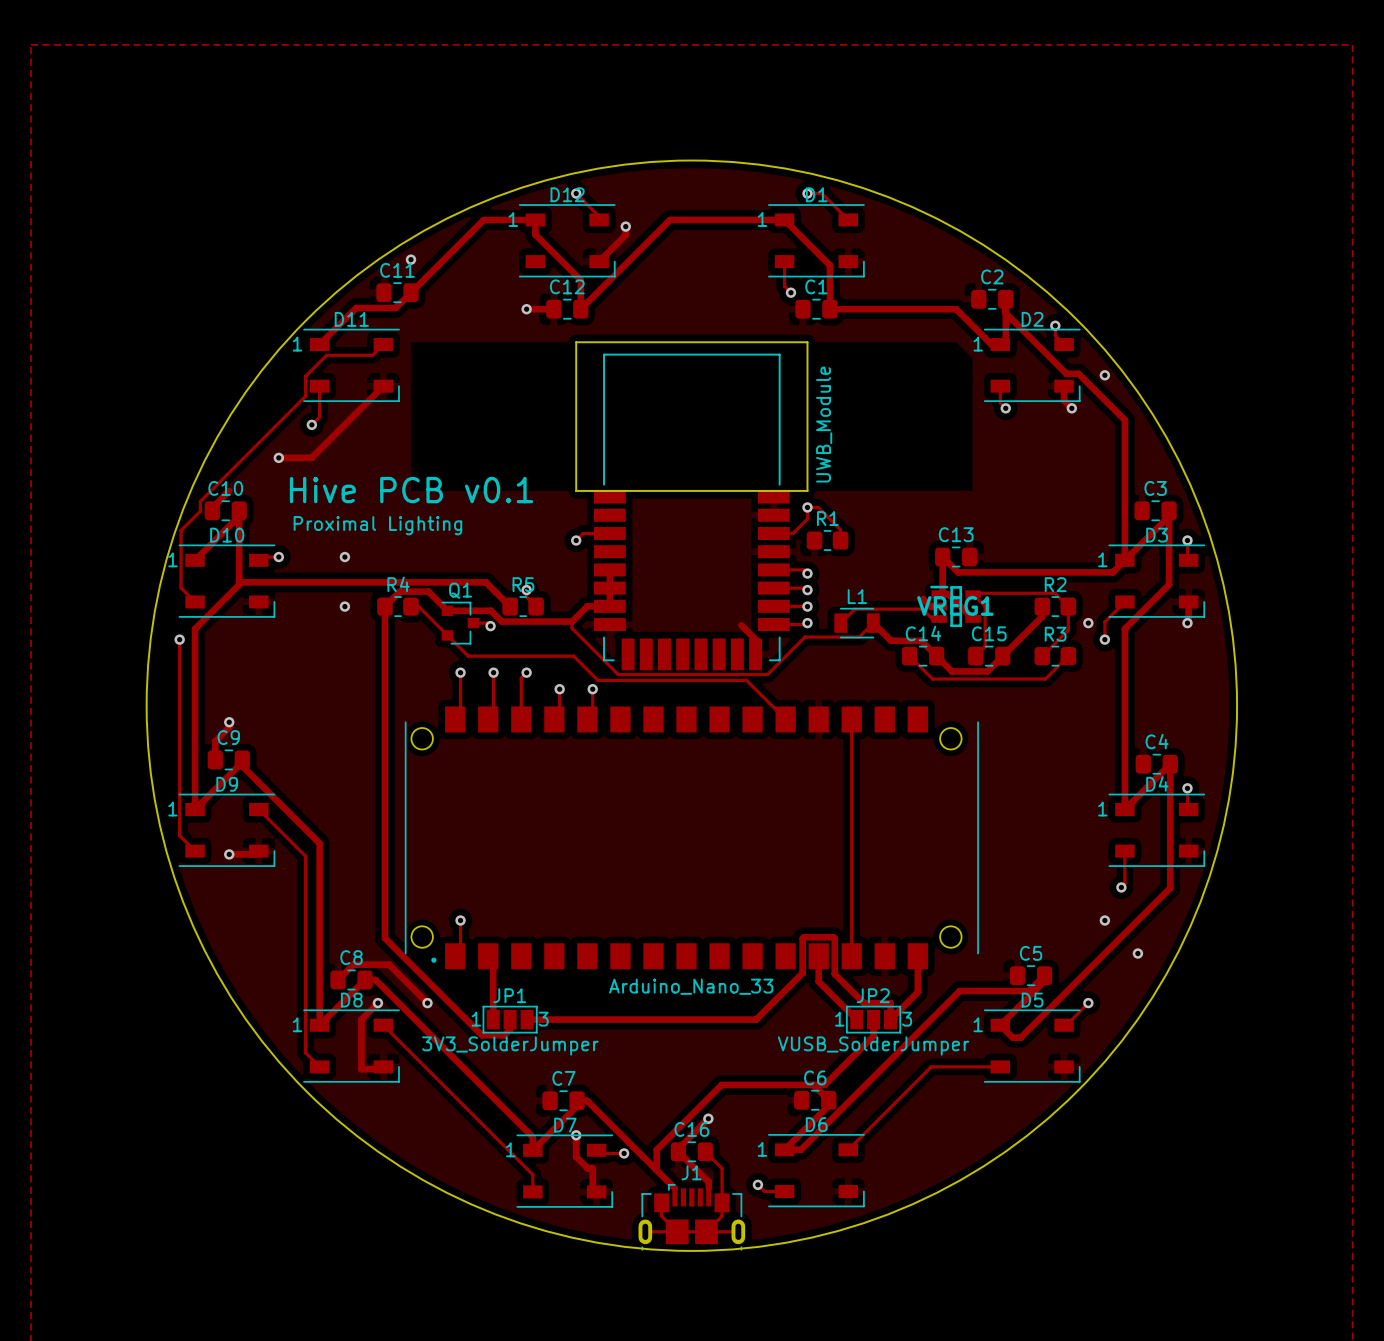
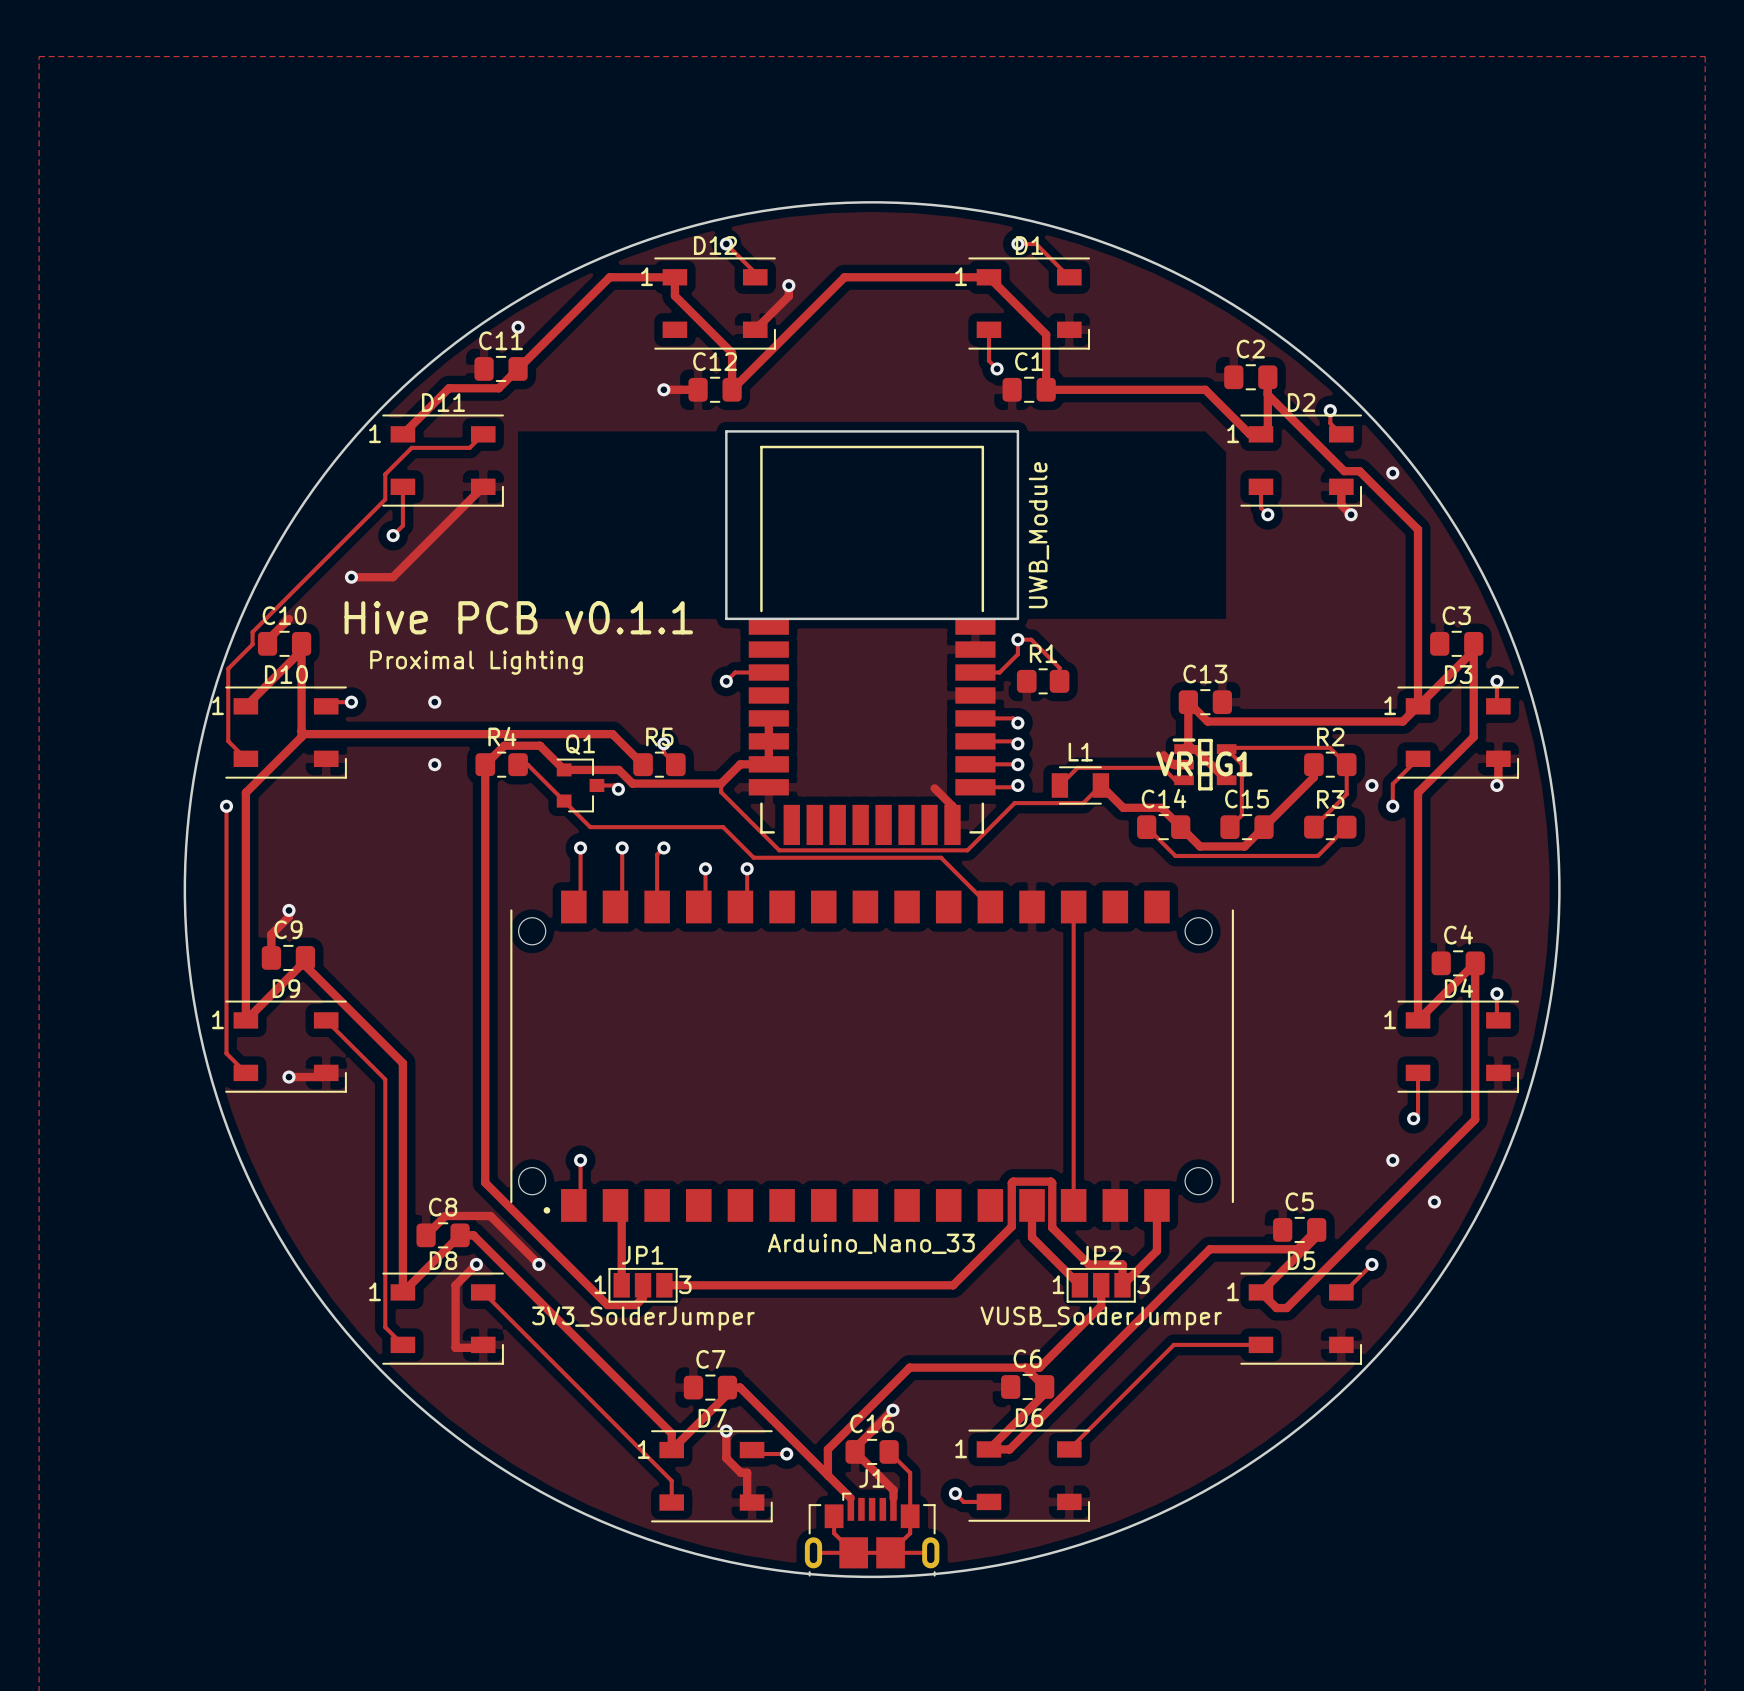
text: Hive PCB v0.1 (411, 490) -> Hive PCB v0.1.1 (518, 617)

